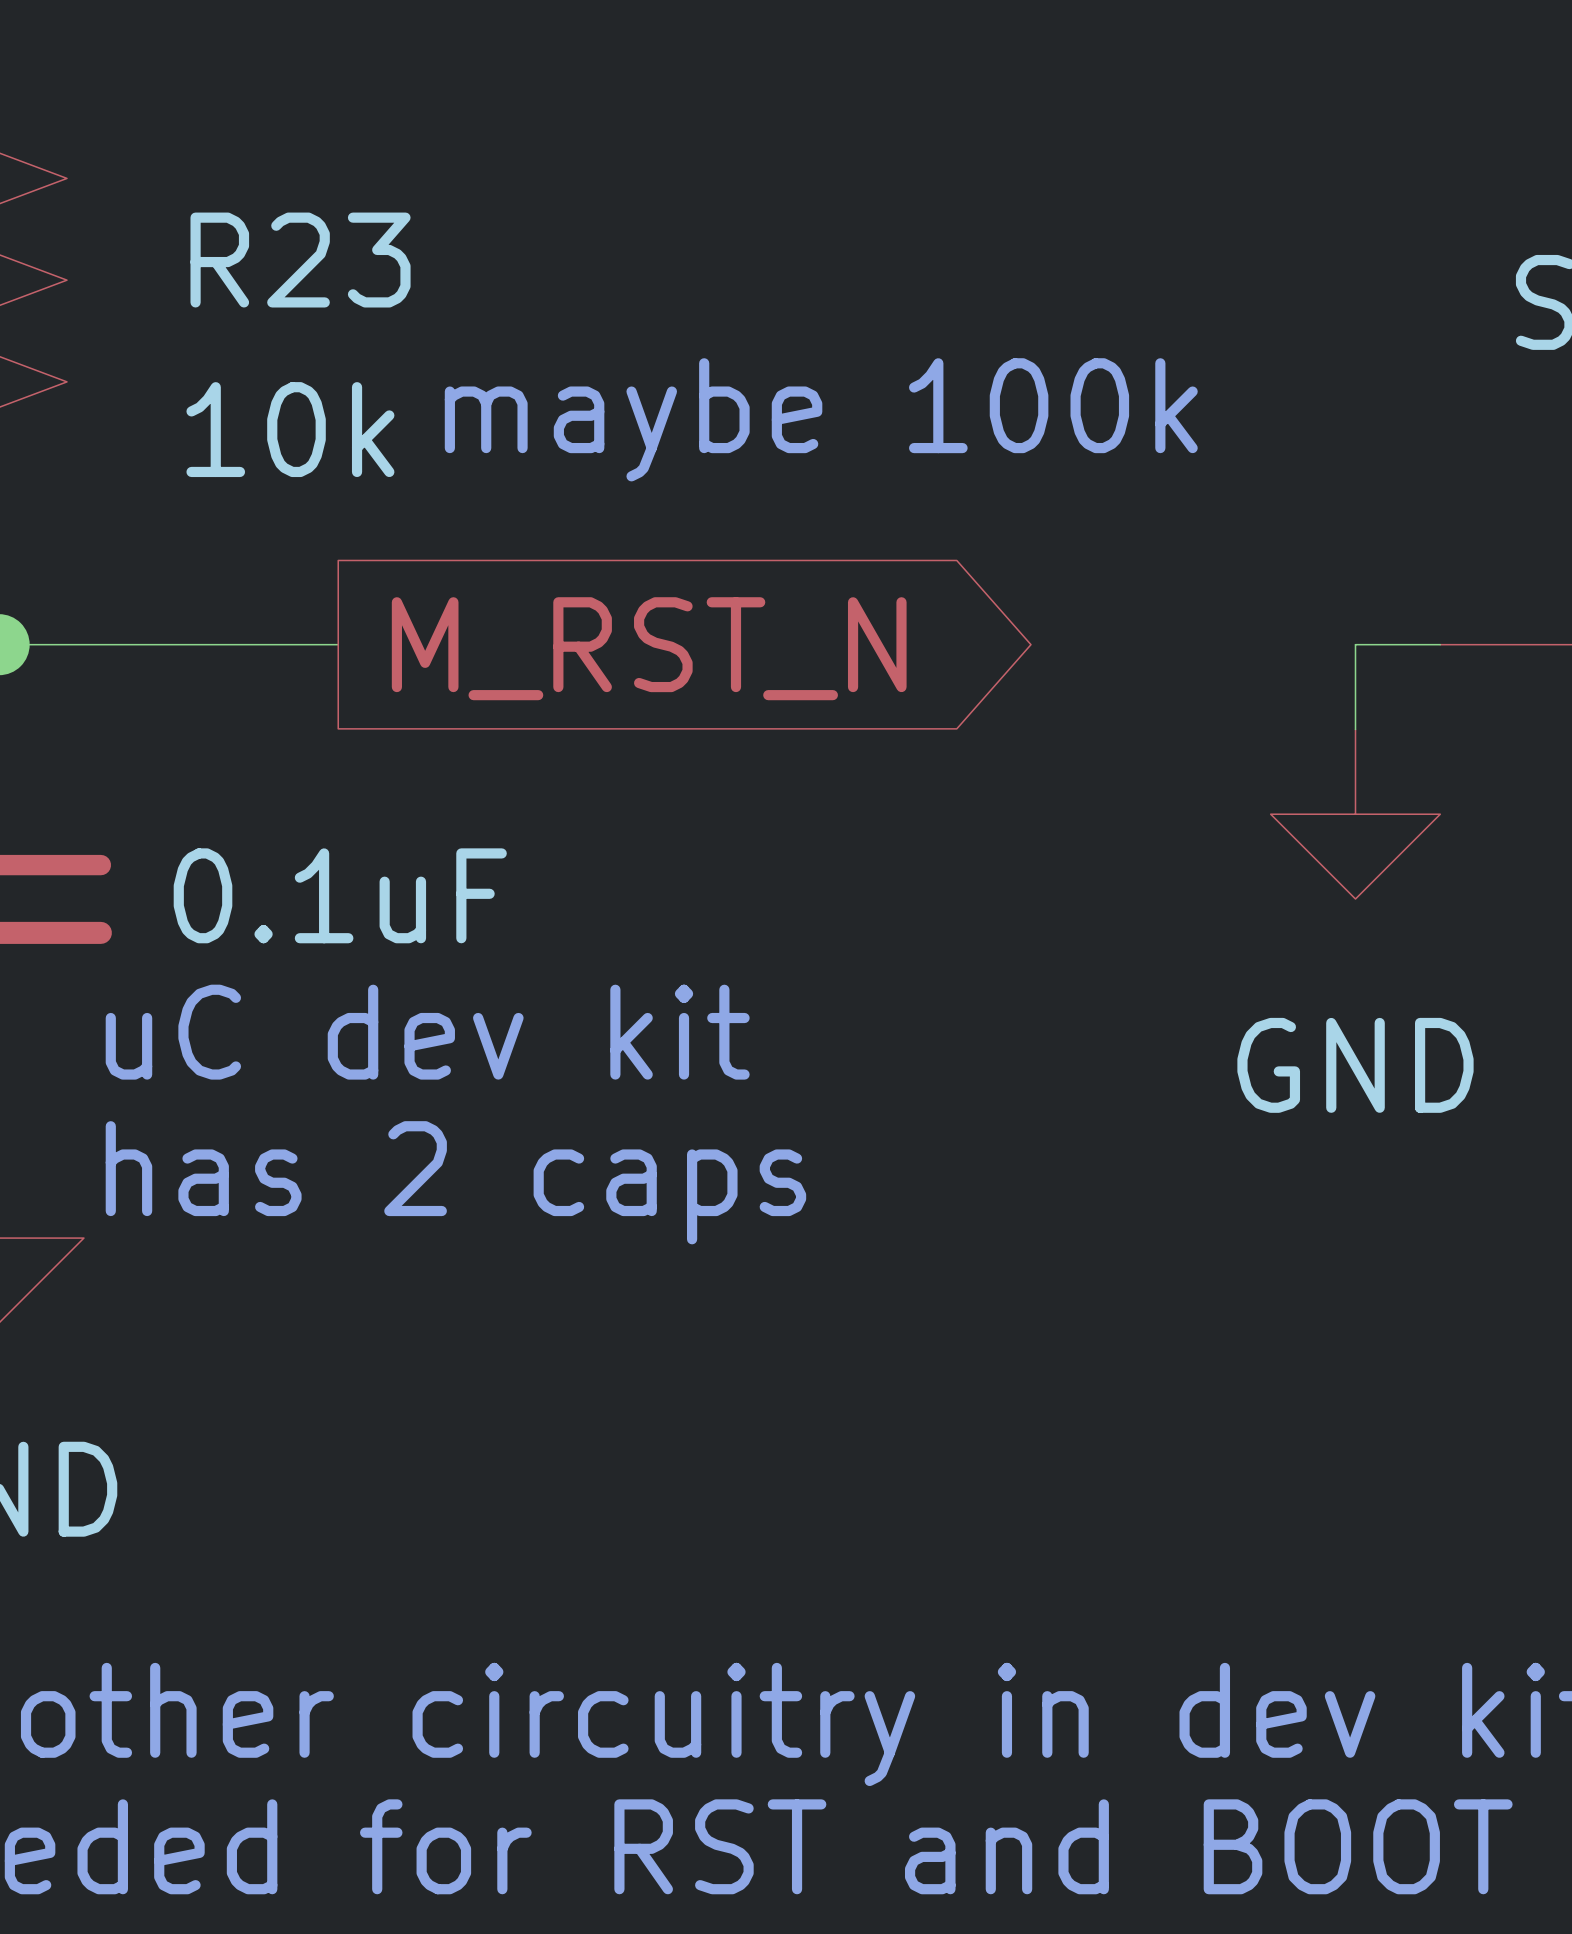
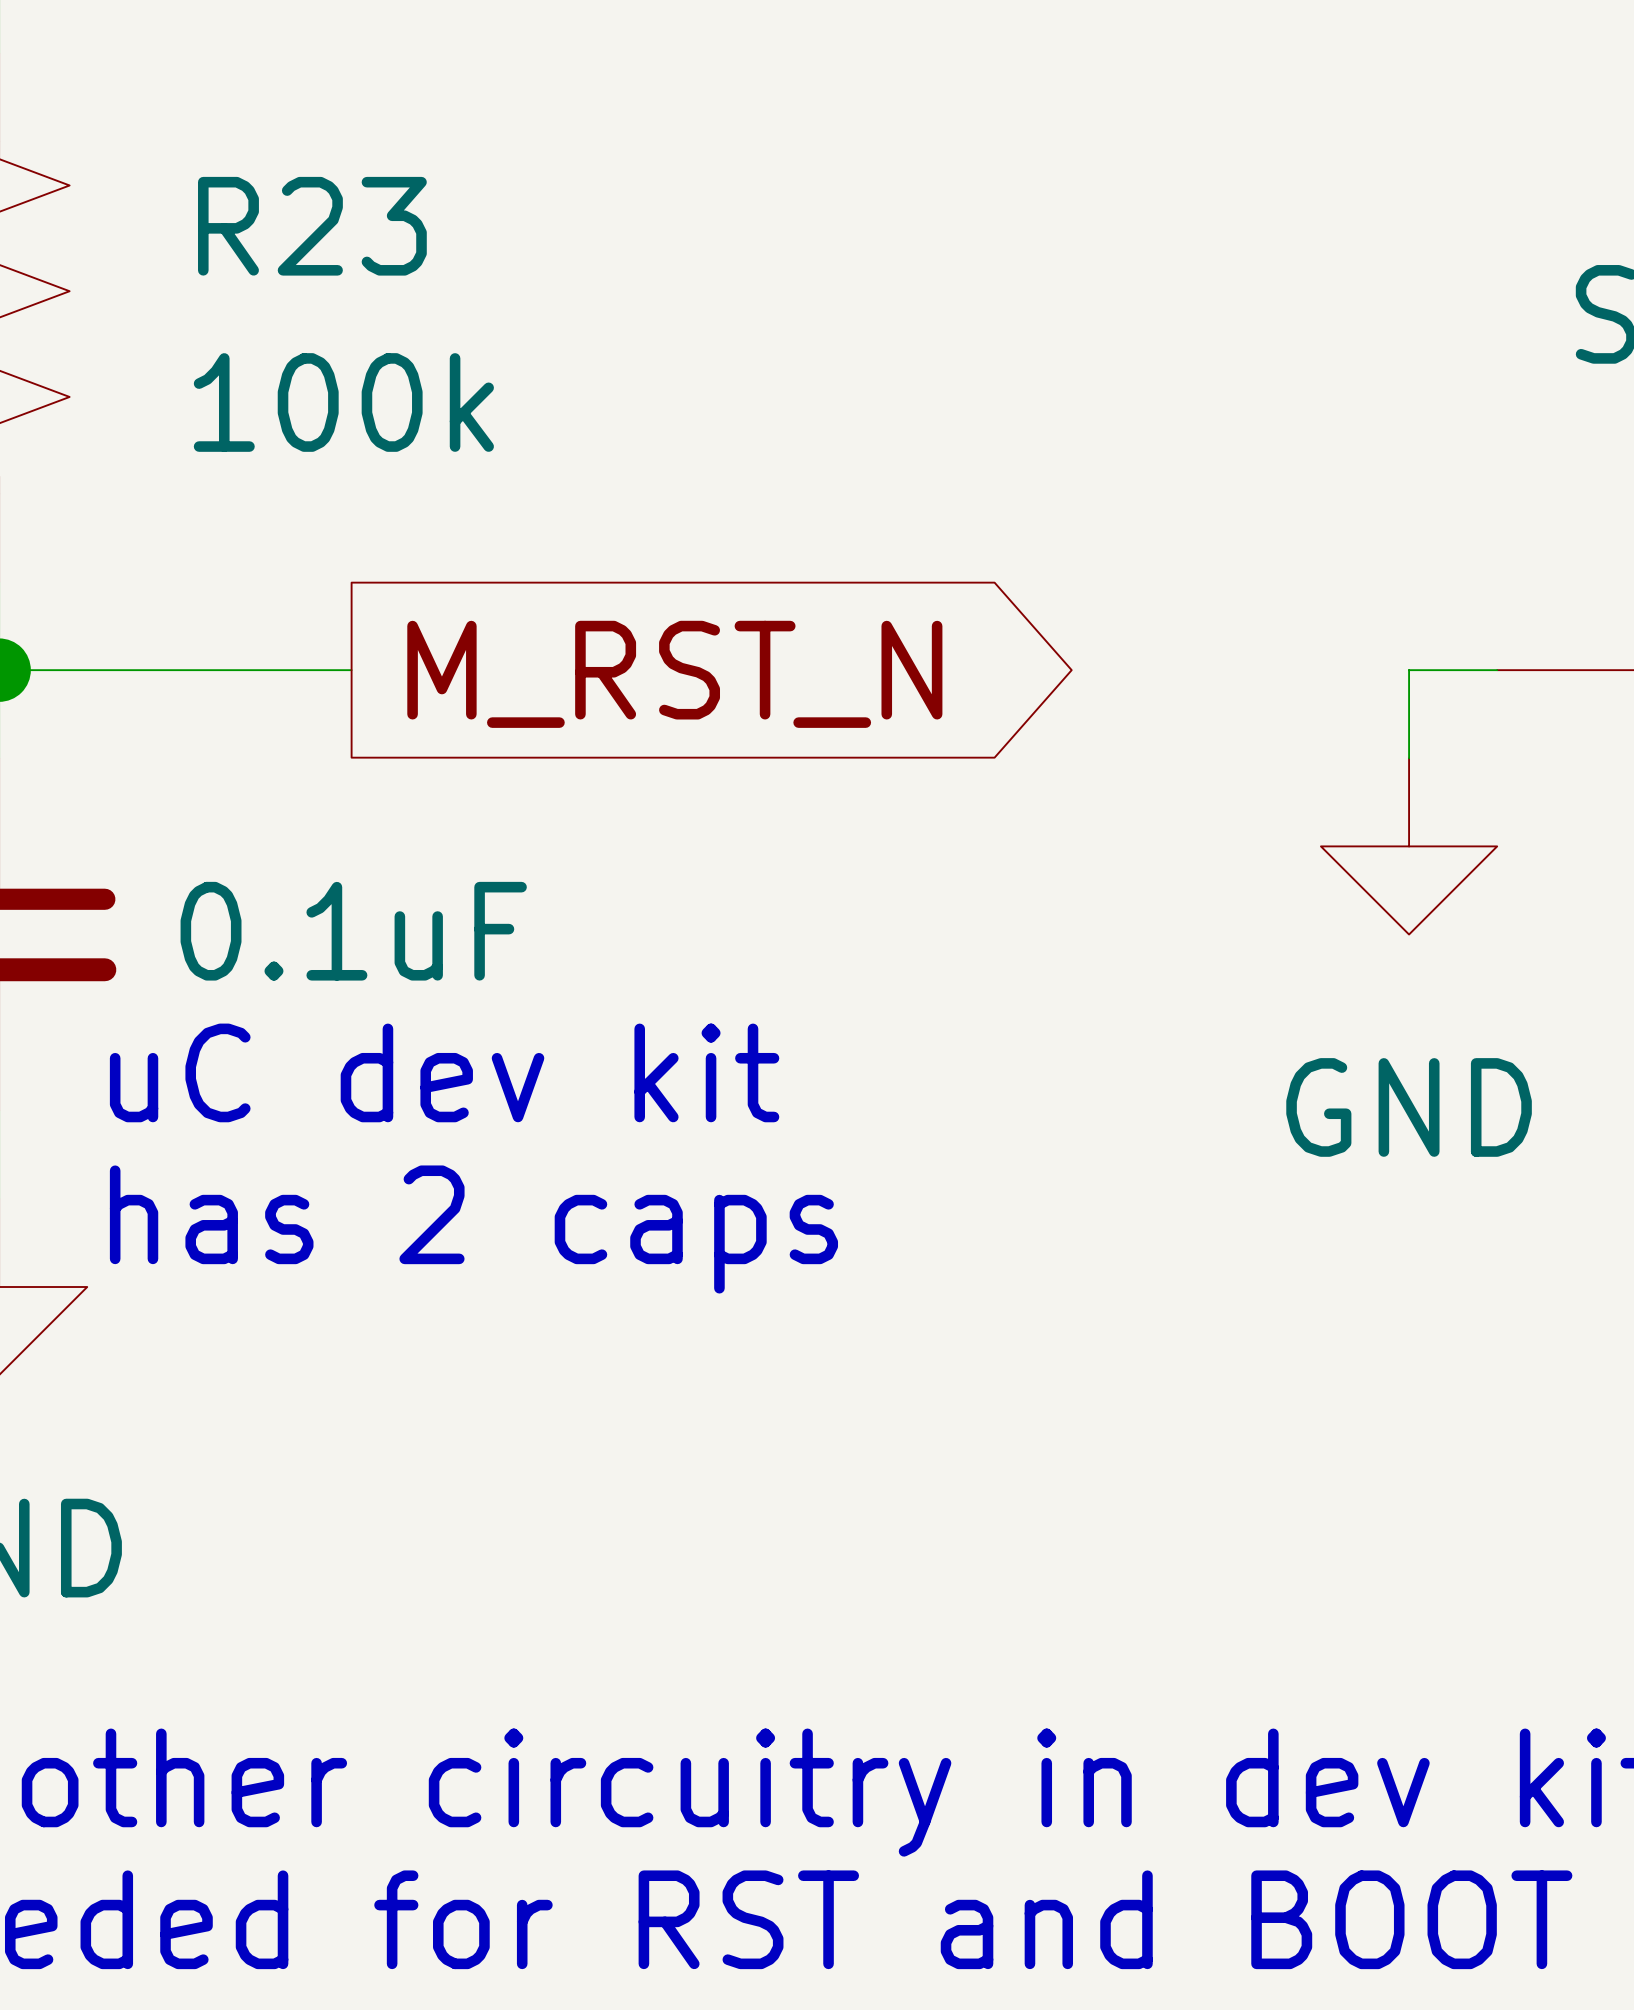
R23 name position: R23 (300, 260) -> R23 (312, 226)
text: maybe 100k (821, 419) -> none
R23 value: 10k (290, 429) -> 100k (343, 402)

